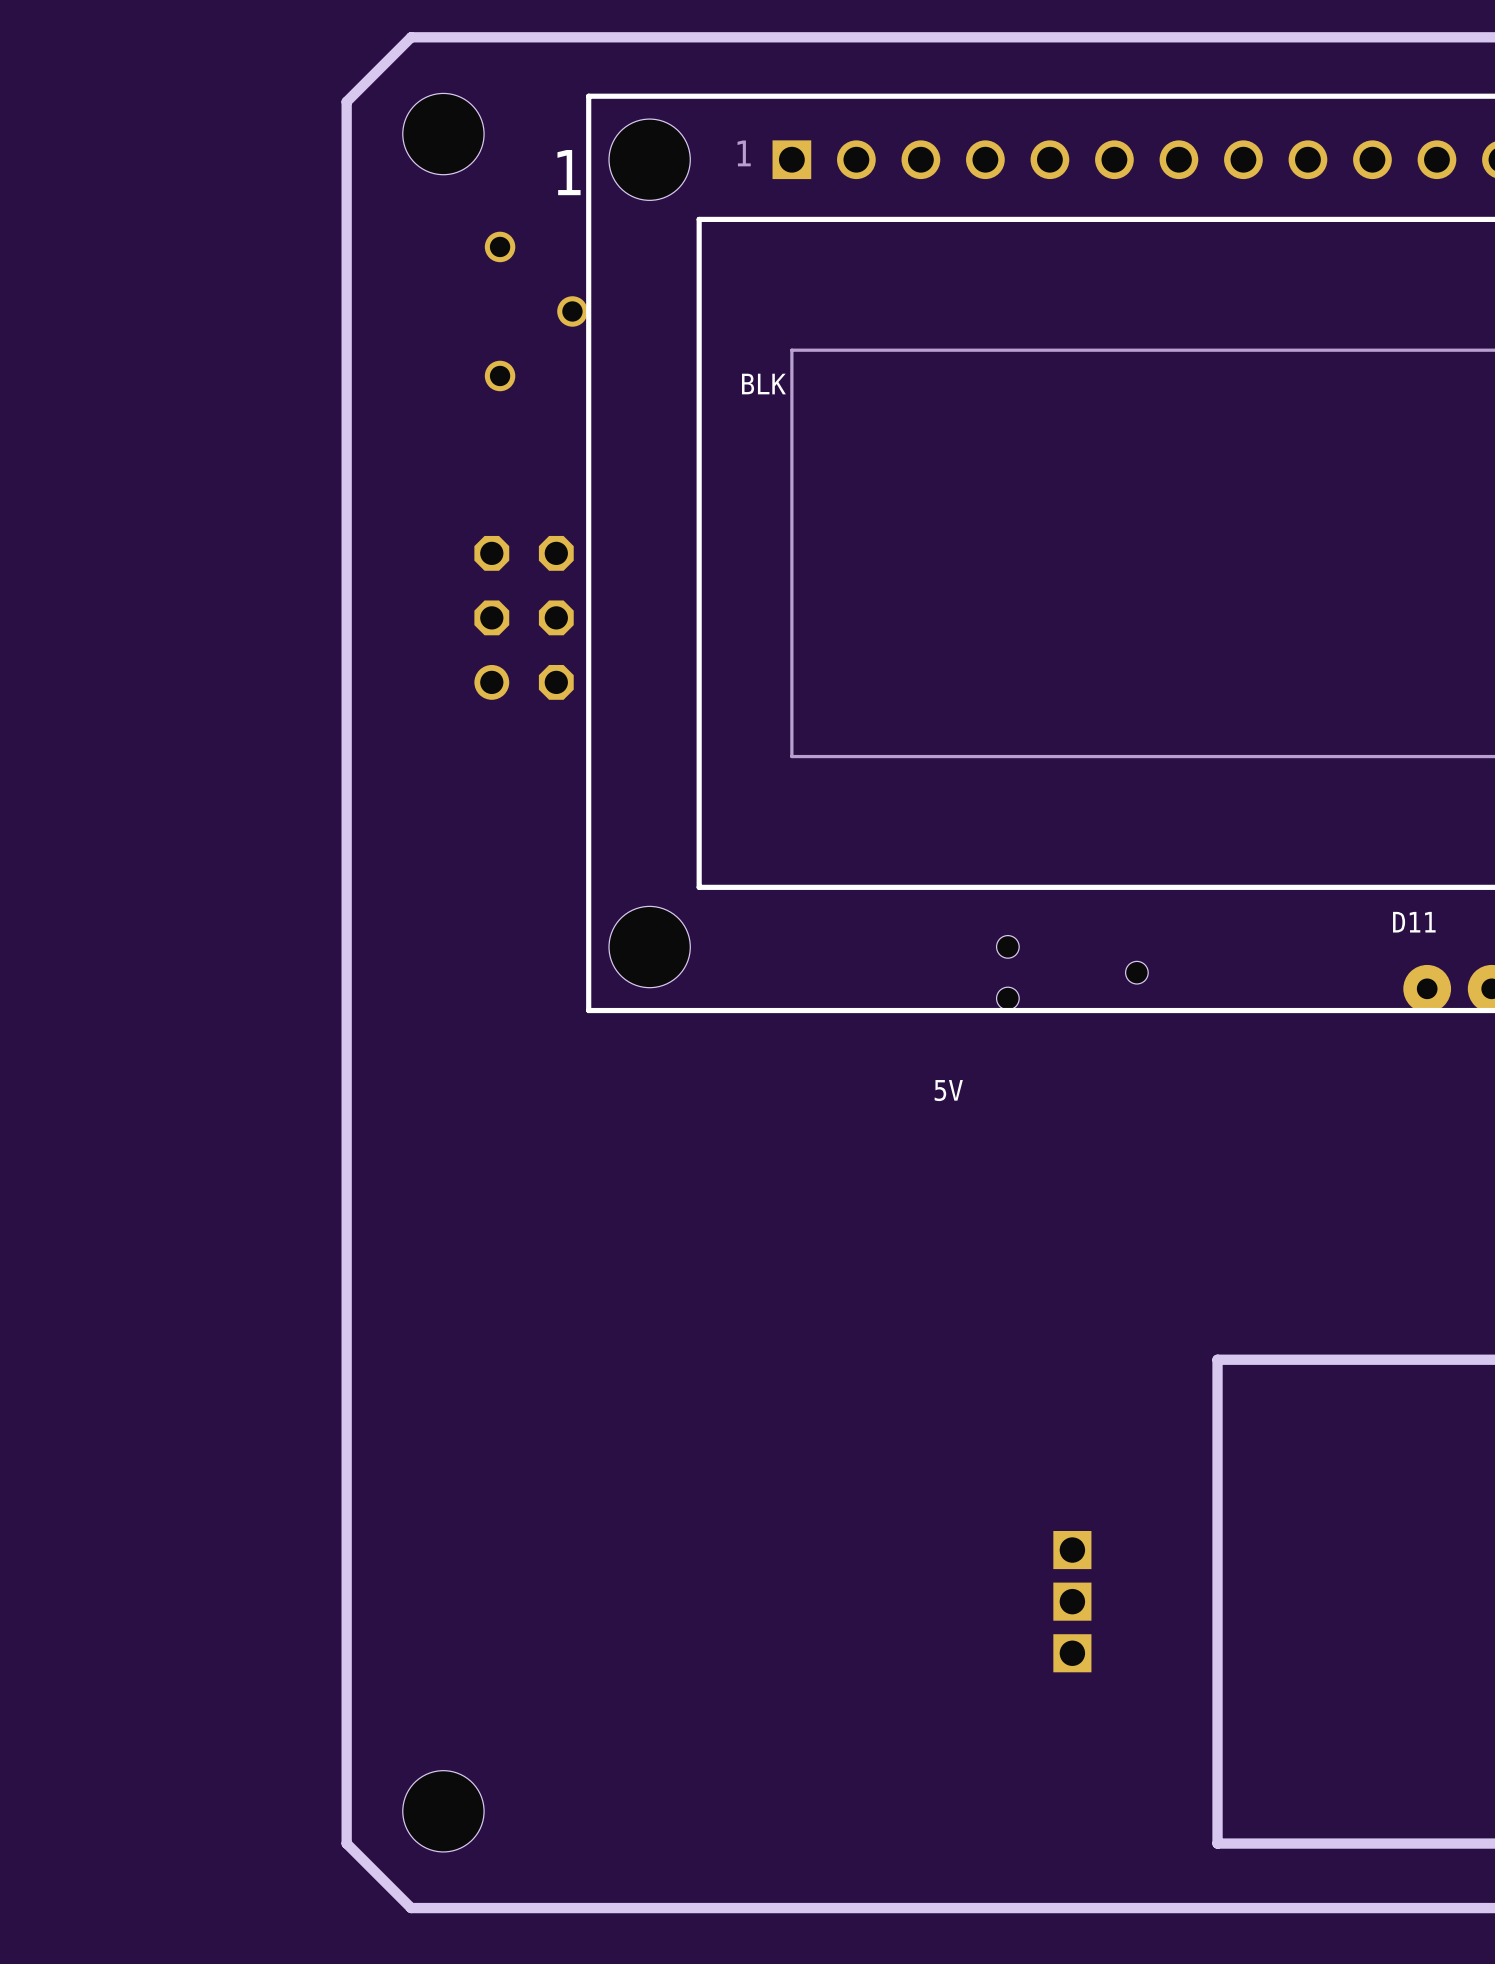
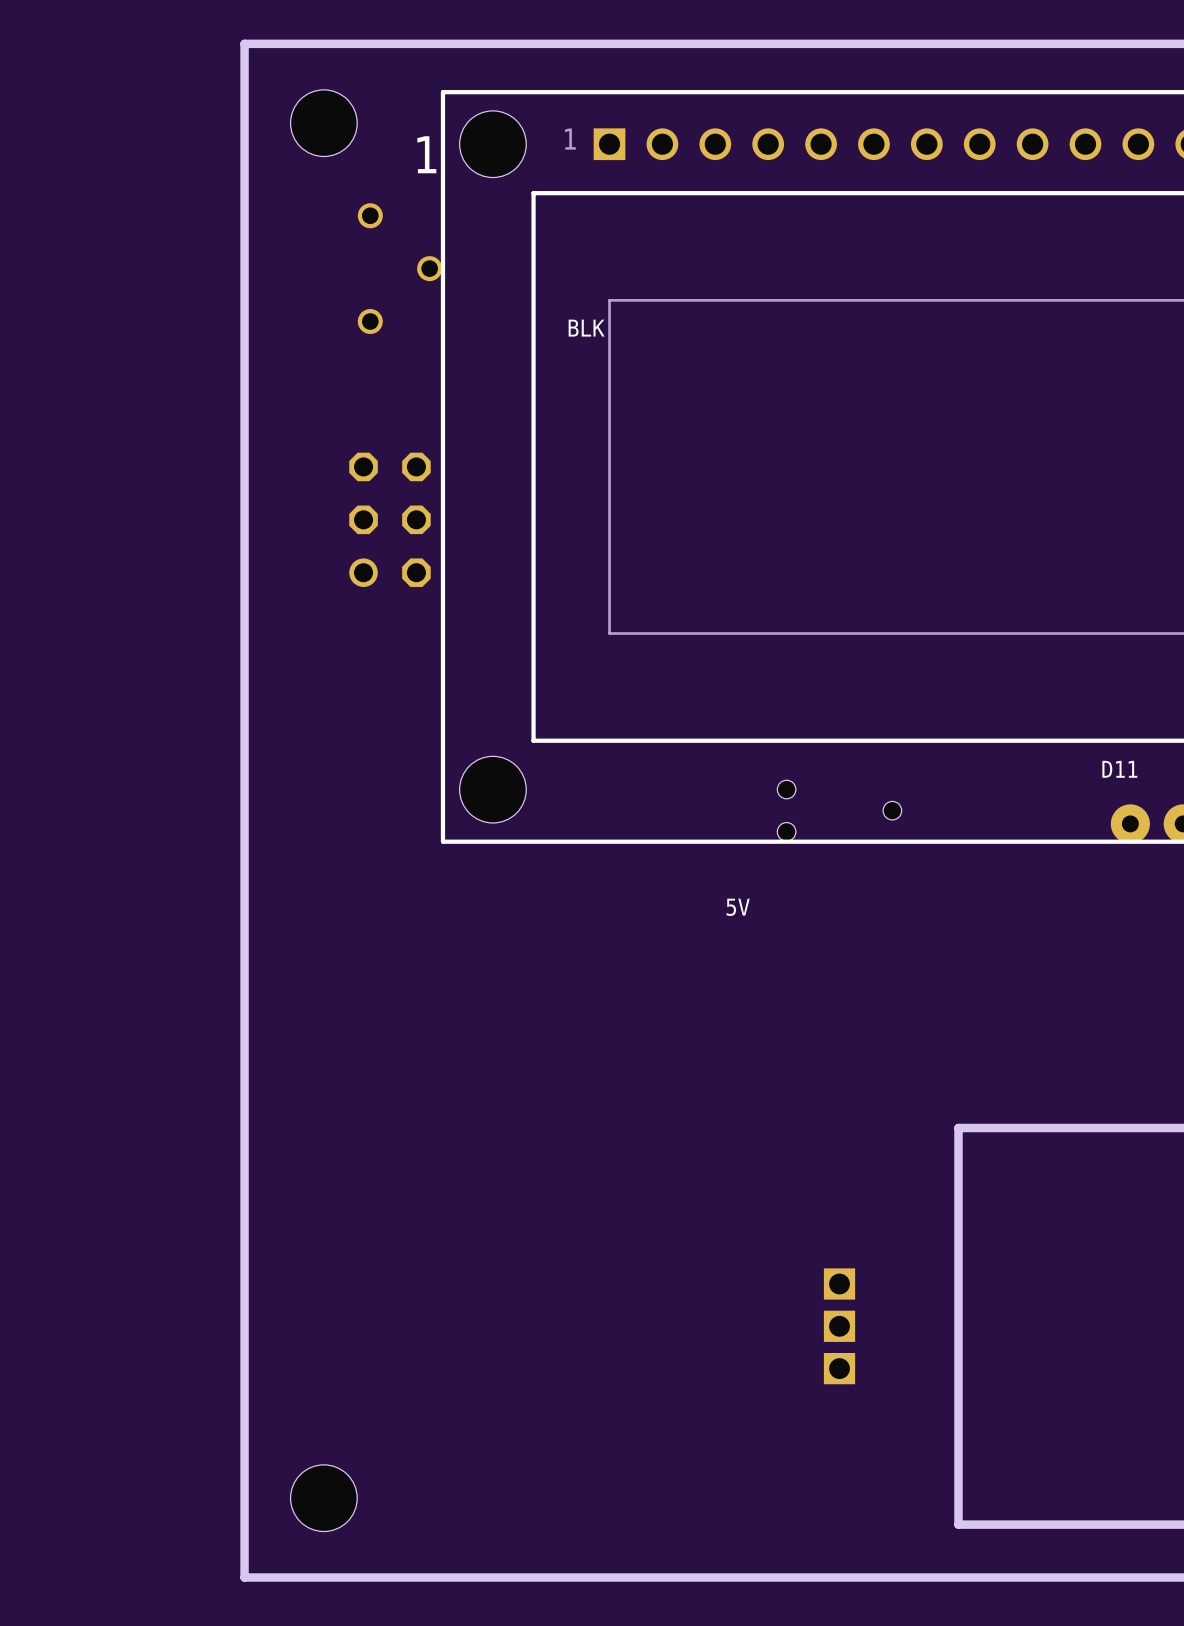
board edge: (411, 37) (346, 101) -> (297, 43) (244, 43) (244, 96)
board edge: (346, 1843) (411, 1908) -> (244, 1524) (244, 1577) (297, 1577)

